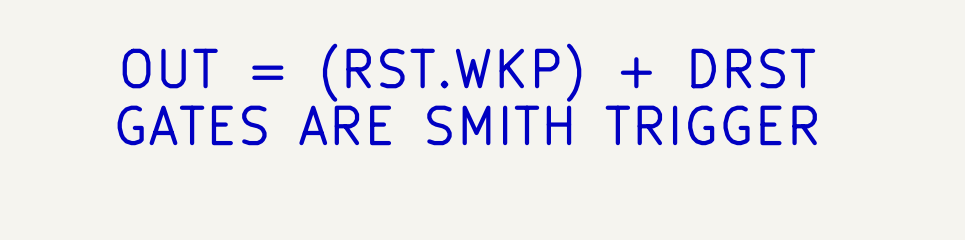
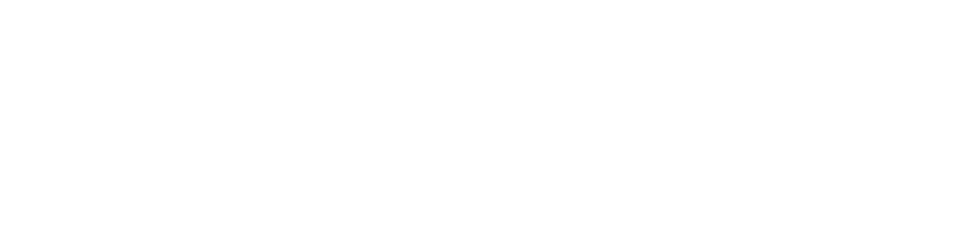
text: OUT = (RST.WKP) + DRST (468, 72) -> none
text: GATES ARE SMITH TRIGGER (467, 125) -> none

